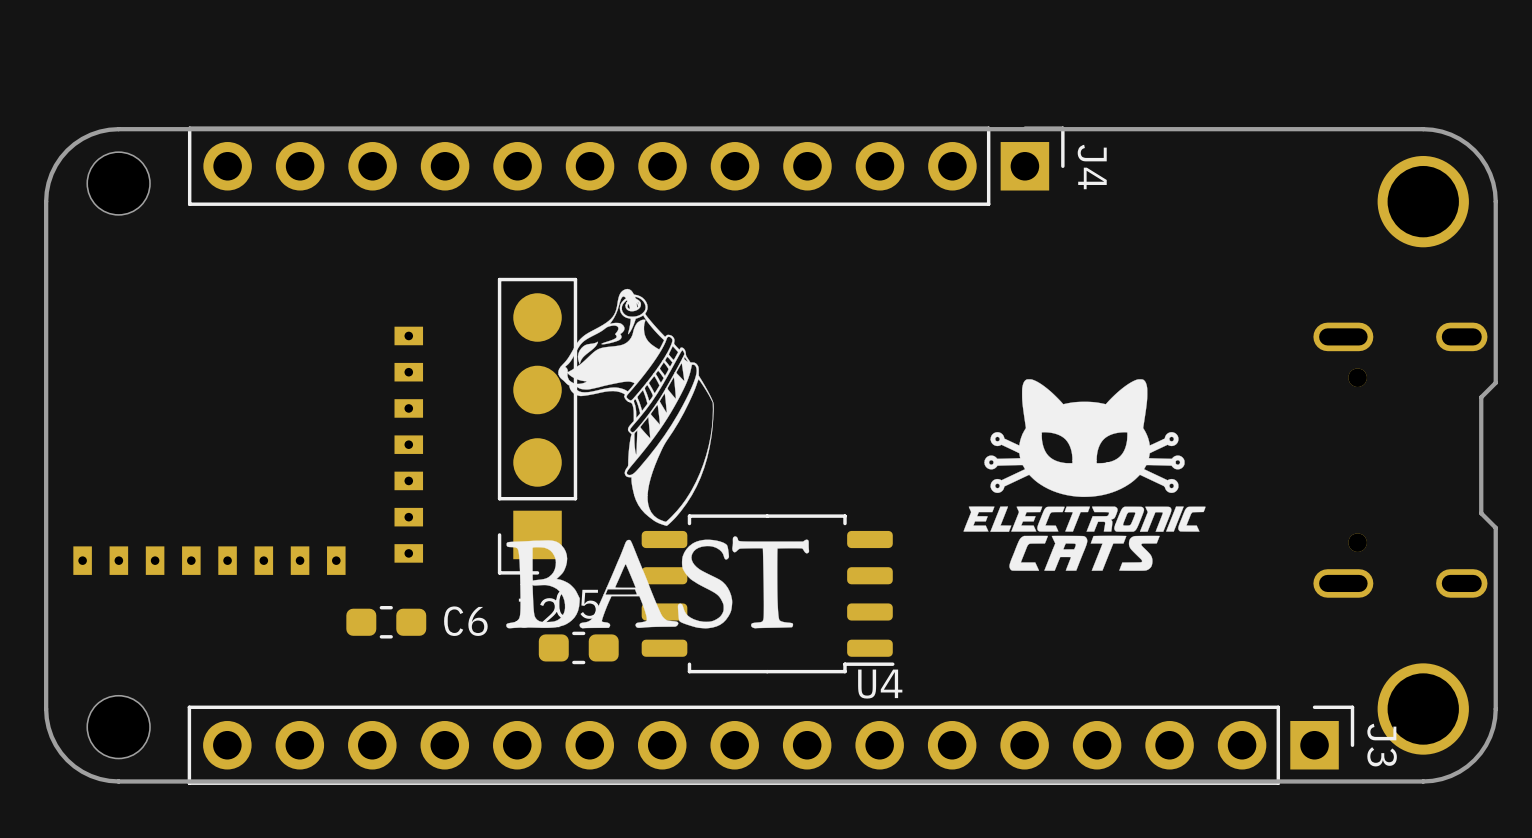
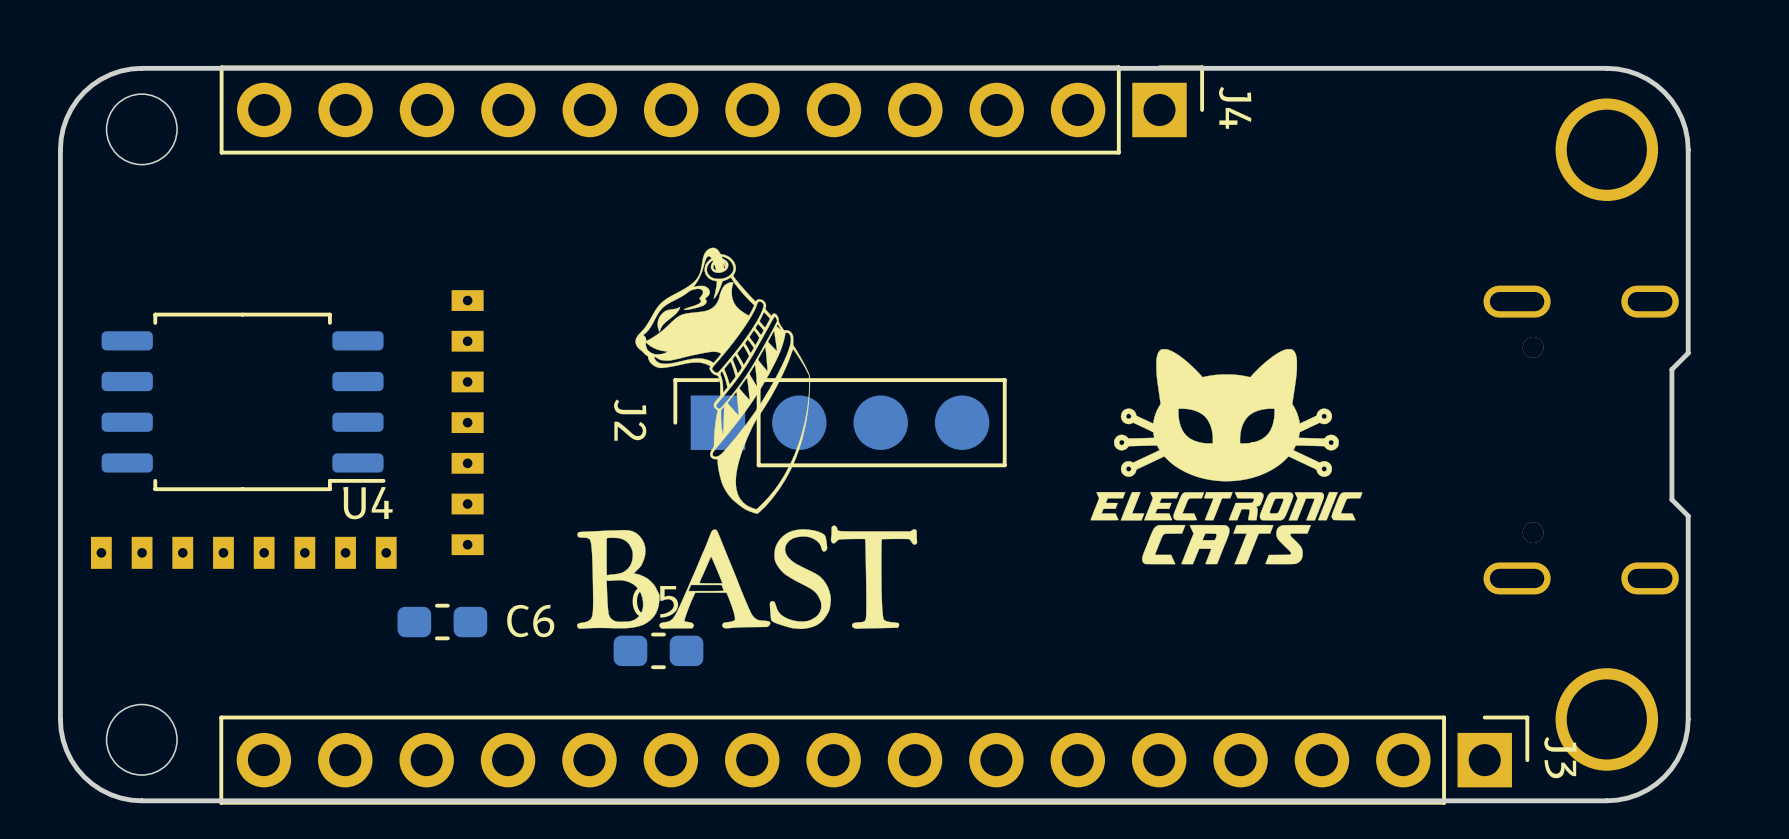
J2 rotation: 0° (537, 426) -> 90° clockwise (840, 422)
J2 position: (537, 426) -> (840, 422)
U4 position: (768, 593) -> (243, 401)

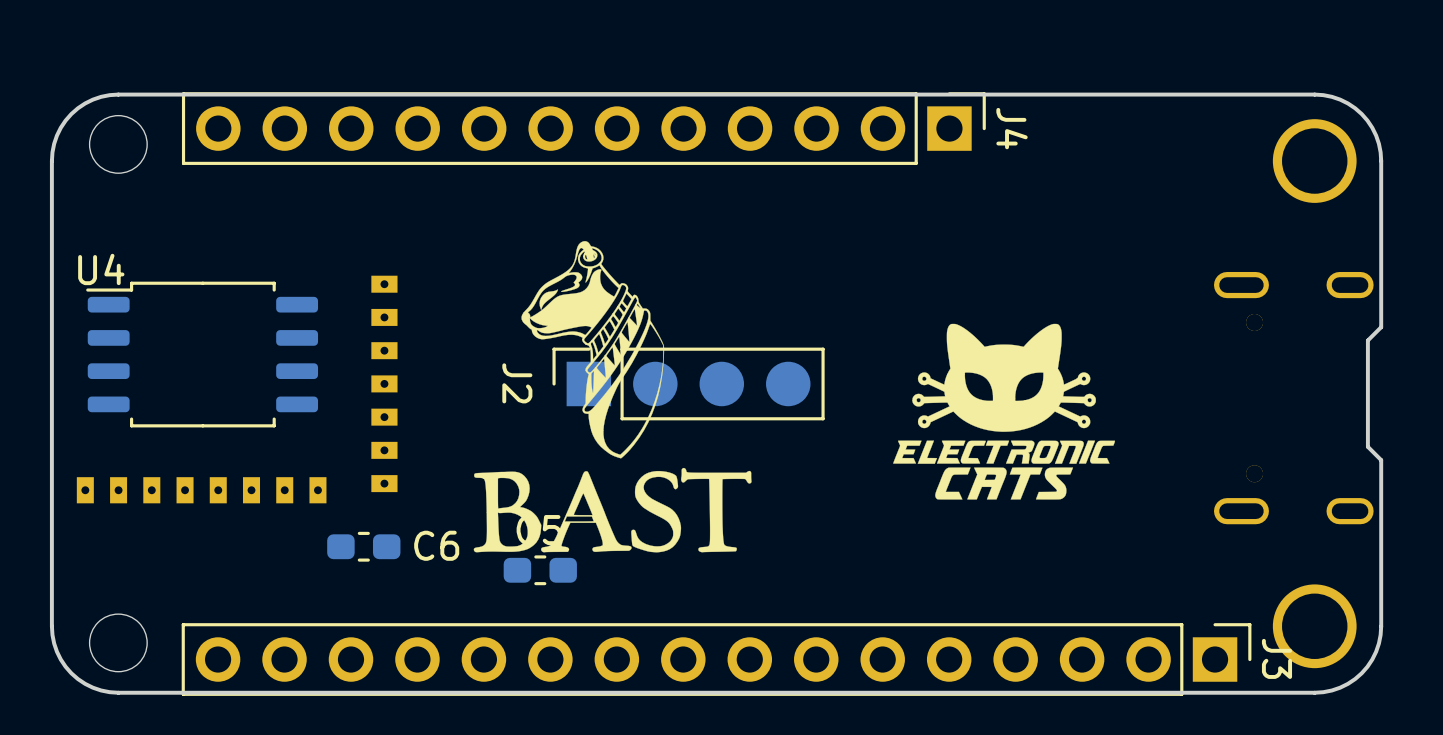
U4 rotation: 0° (243, 401) -> 180° (202, 354)

